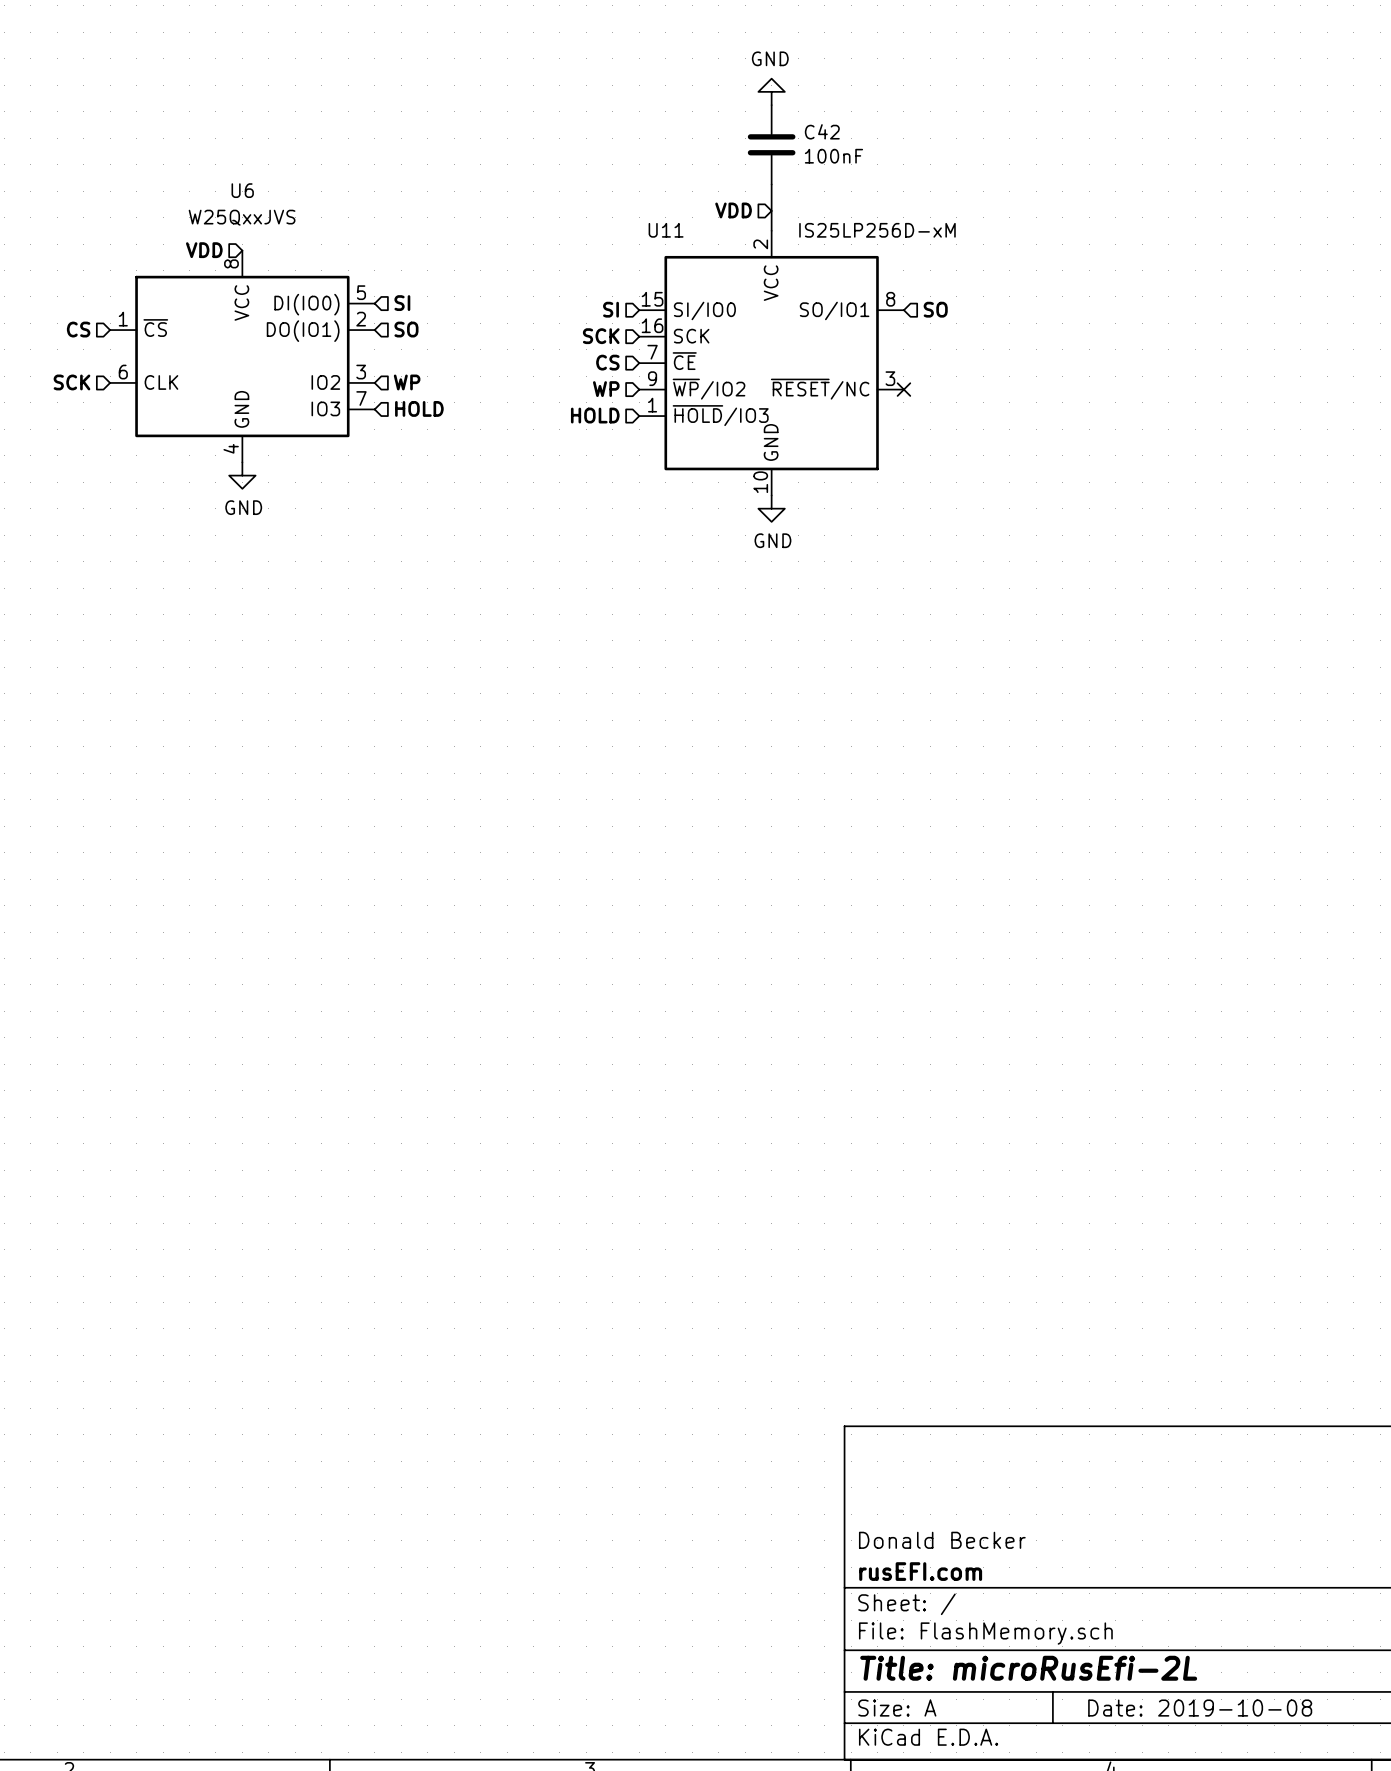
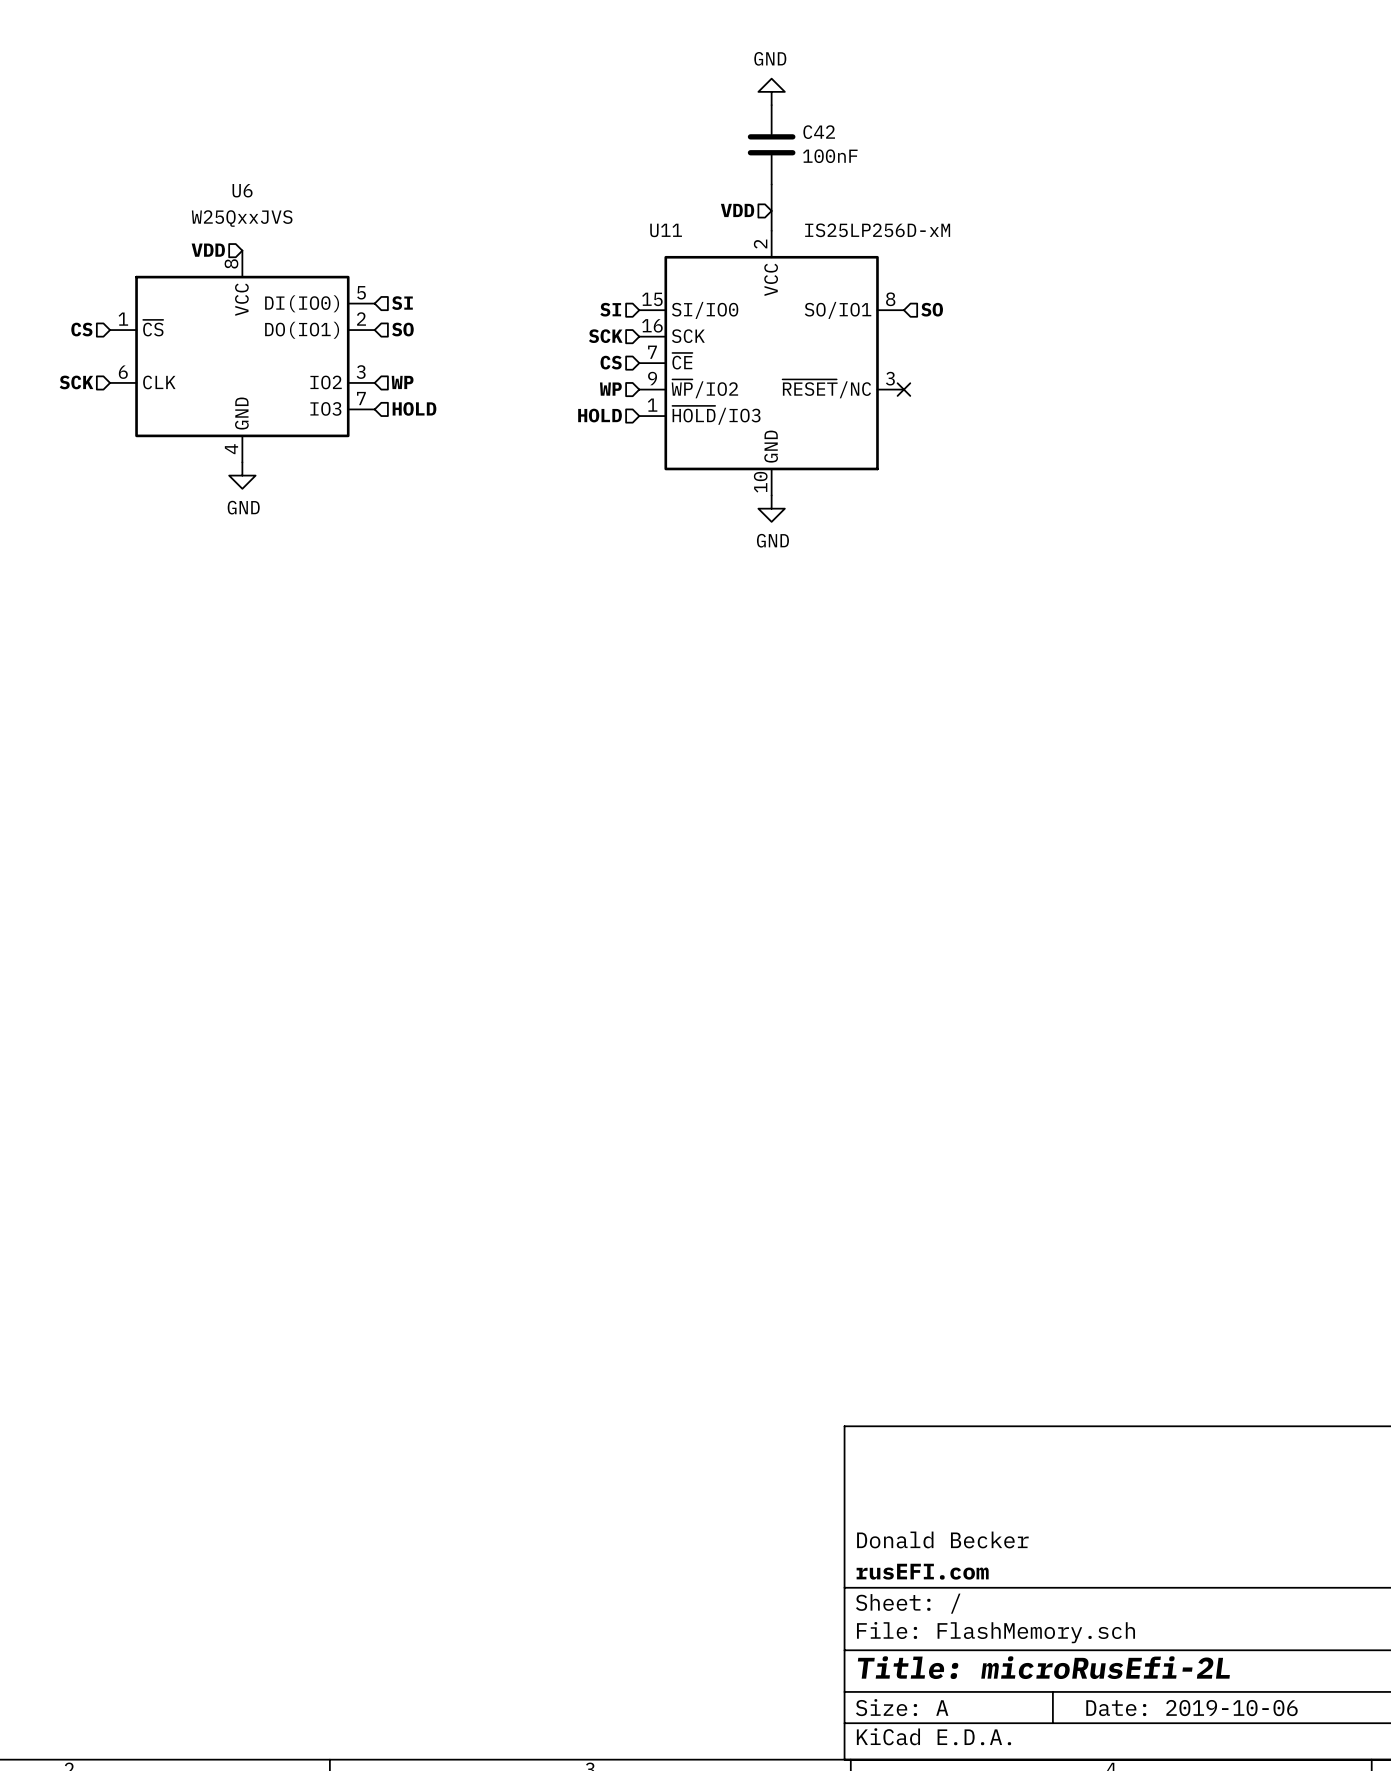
title block: Date: 2019-10-08 (1200, 1708) -> Date: 2019-10-06 (1191, 1708)

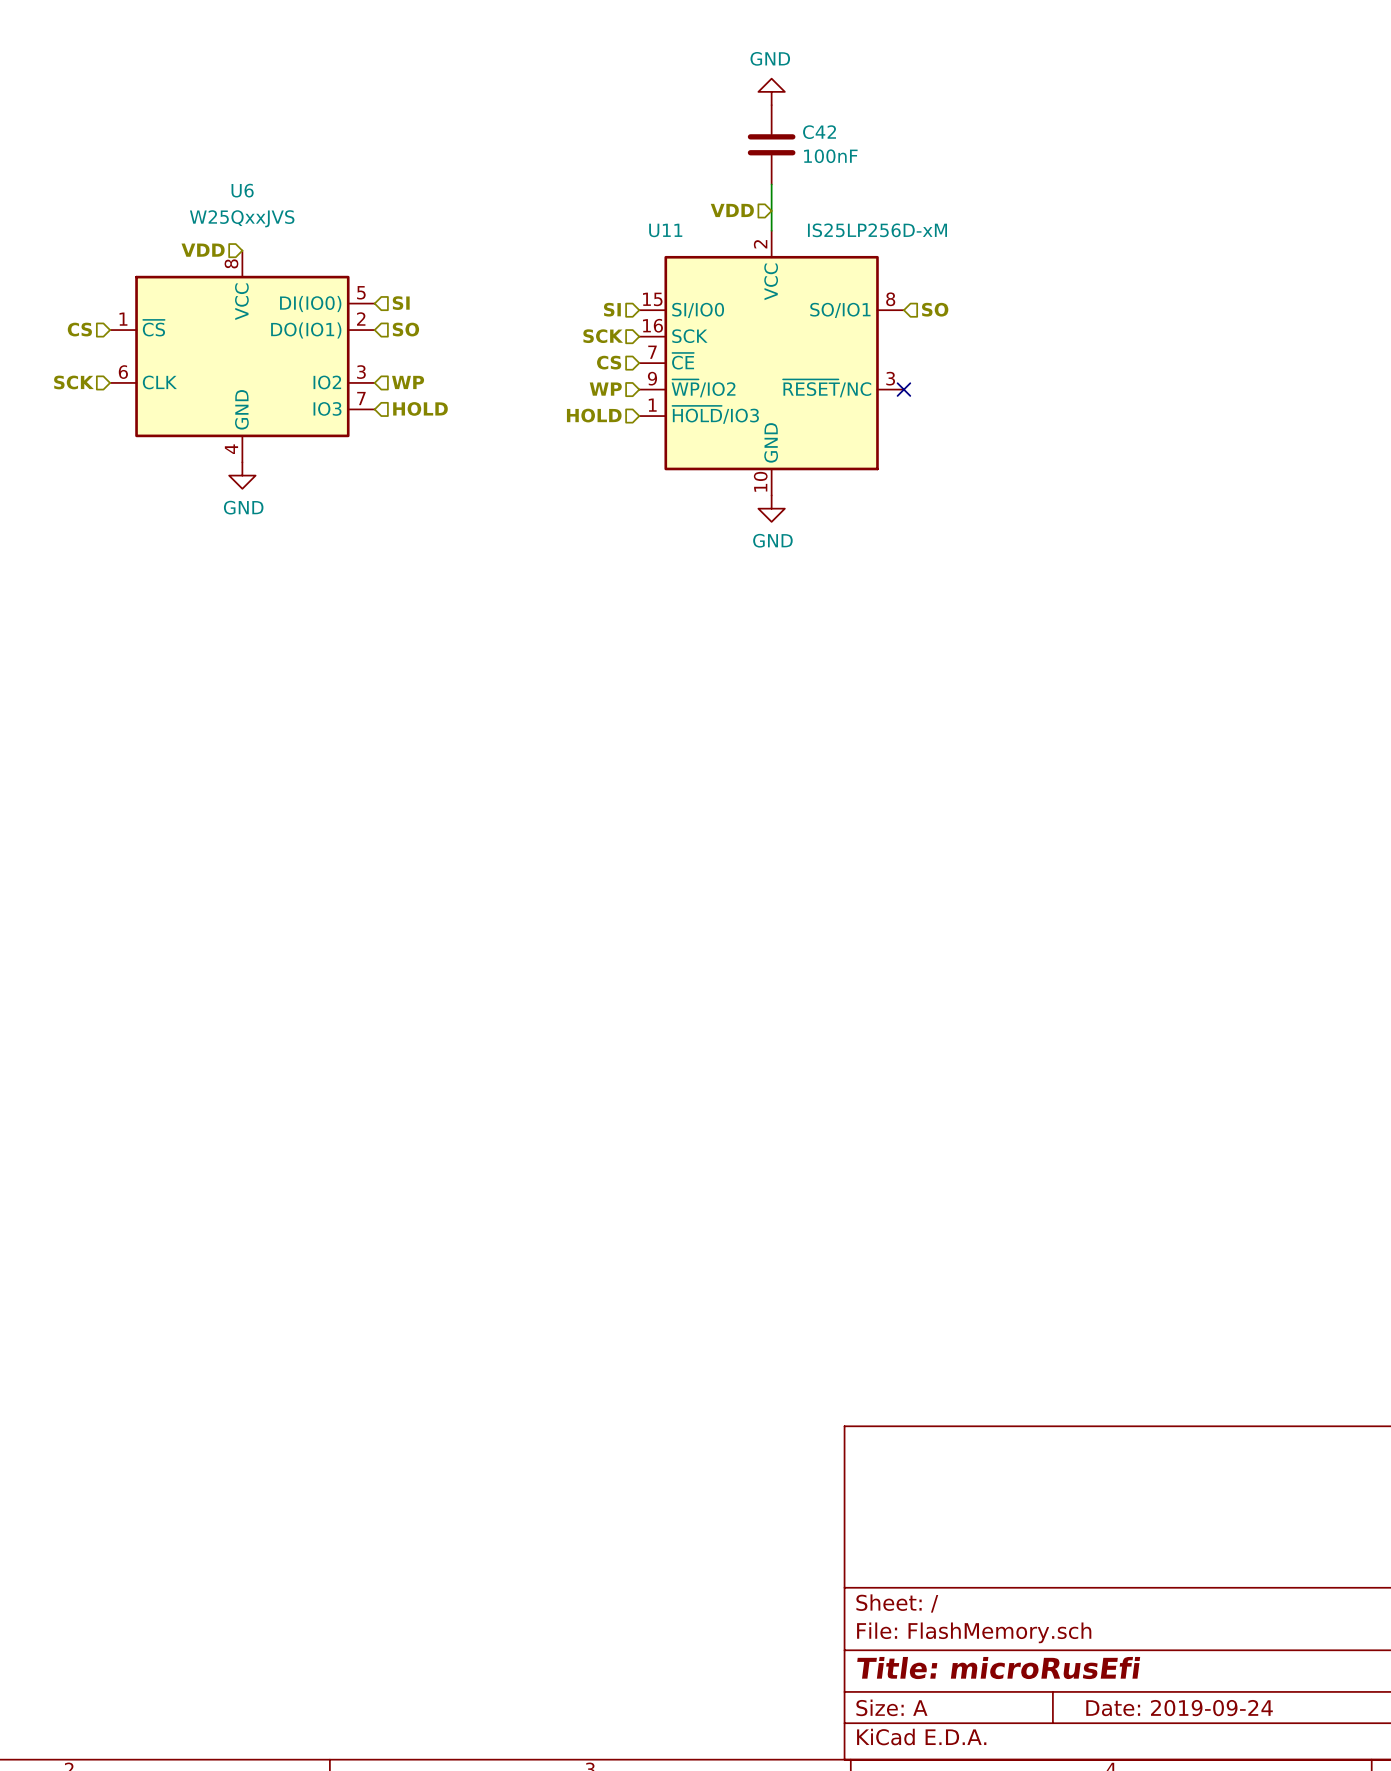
title block: Donald Becker (942, 1539) -> none
title block: rusEFI.com (922, 1571) -> none
title block: Title: microRusEfi-2L (1043, 1667) -> Title: microRusEfi (998, 1668)
title block: Date: 2019-10-06 (1191, 1708) -> Date: 2019-09-24 (1179, 1708)

